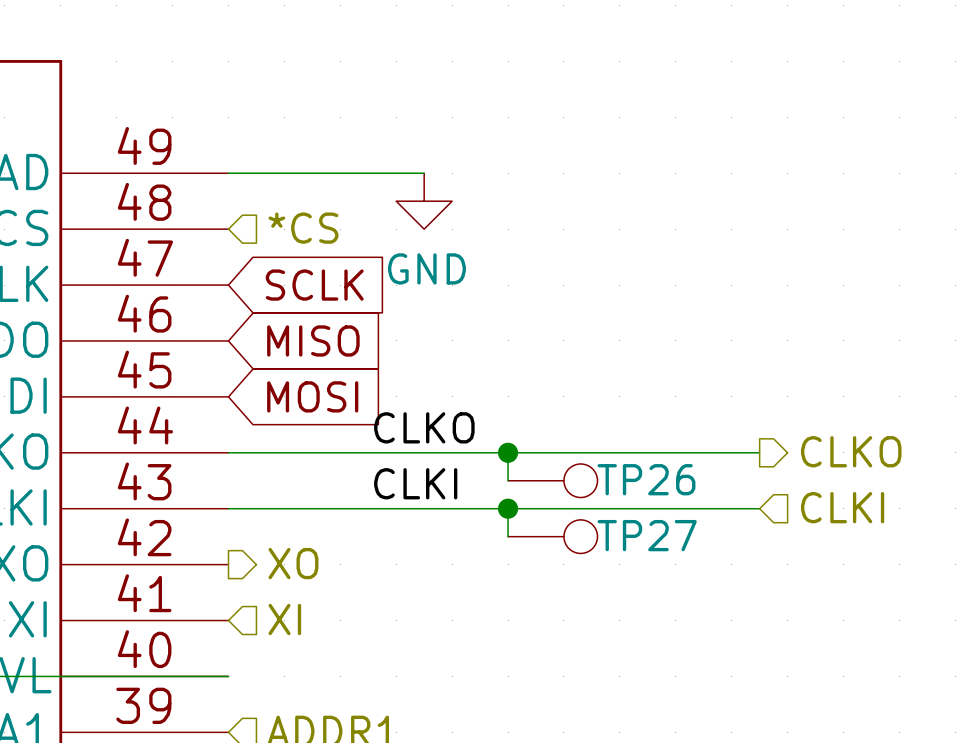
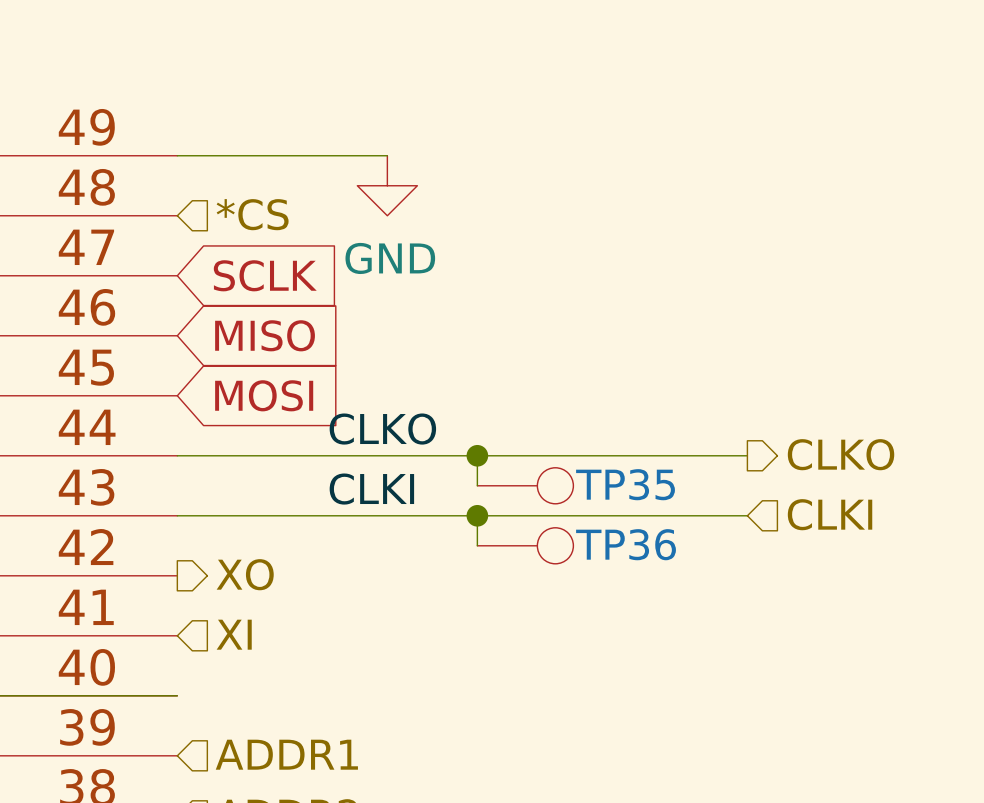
TP26 name: TP26 (646, 479) -> TP35 (625, 484)
TP27 name: TP27 (647, 535) -> TP36 (626, 544)

